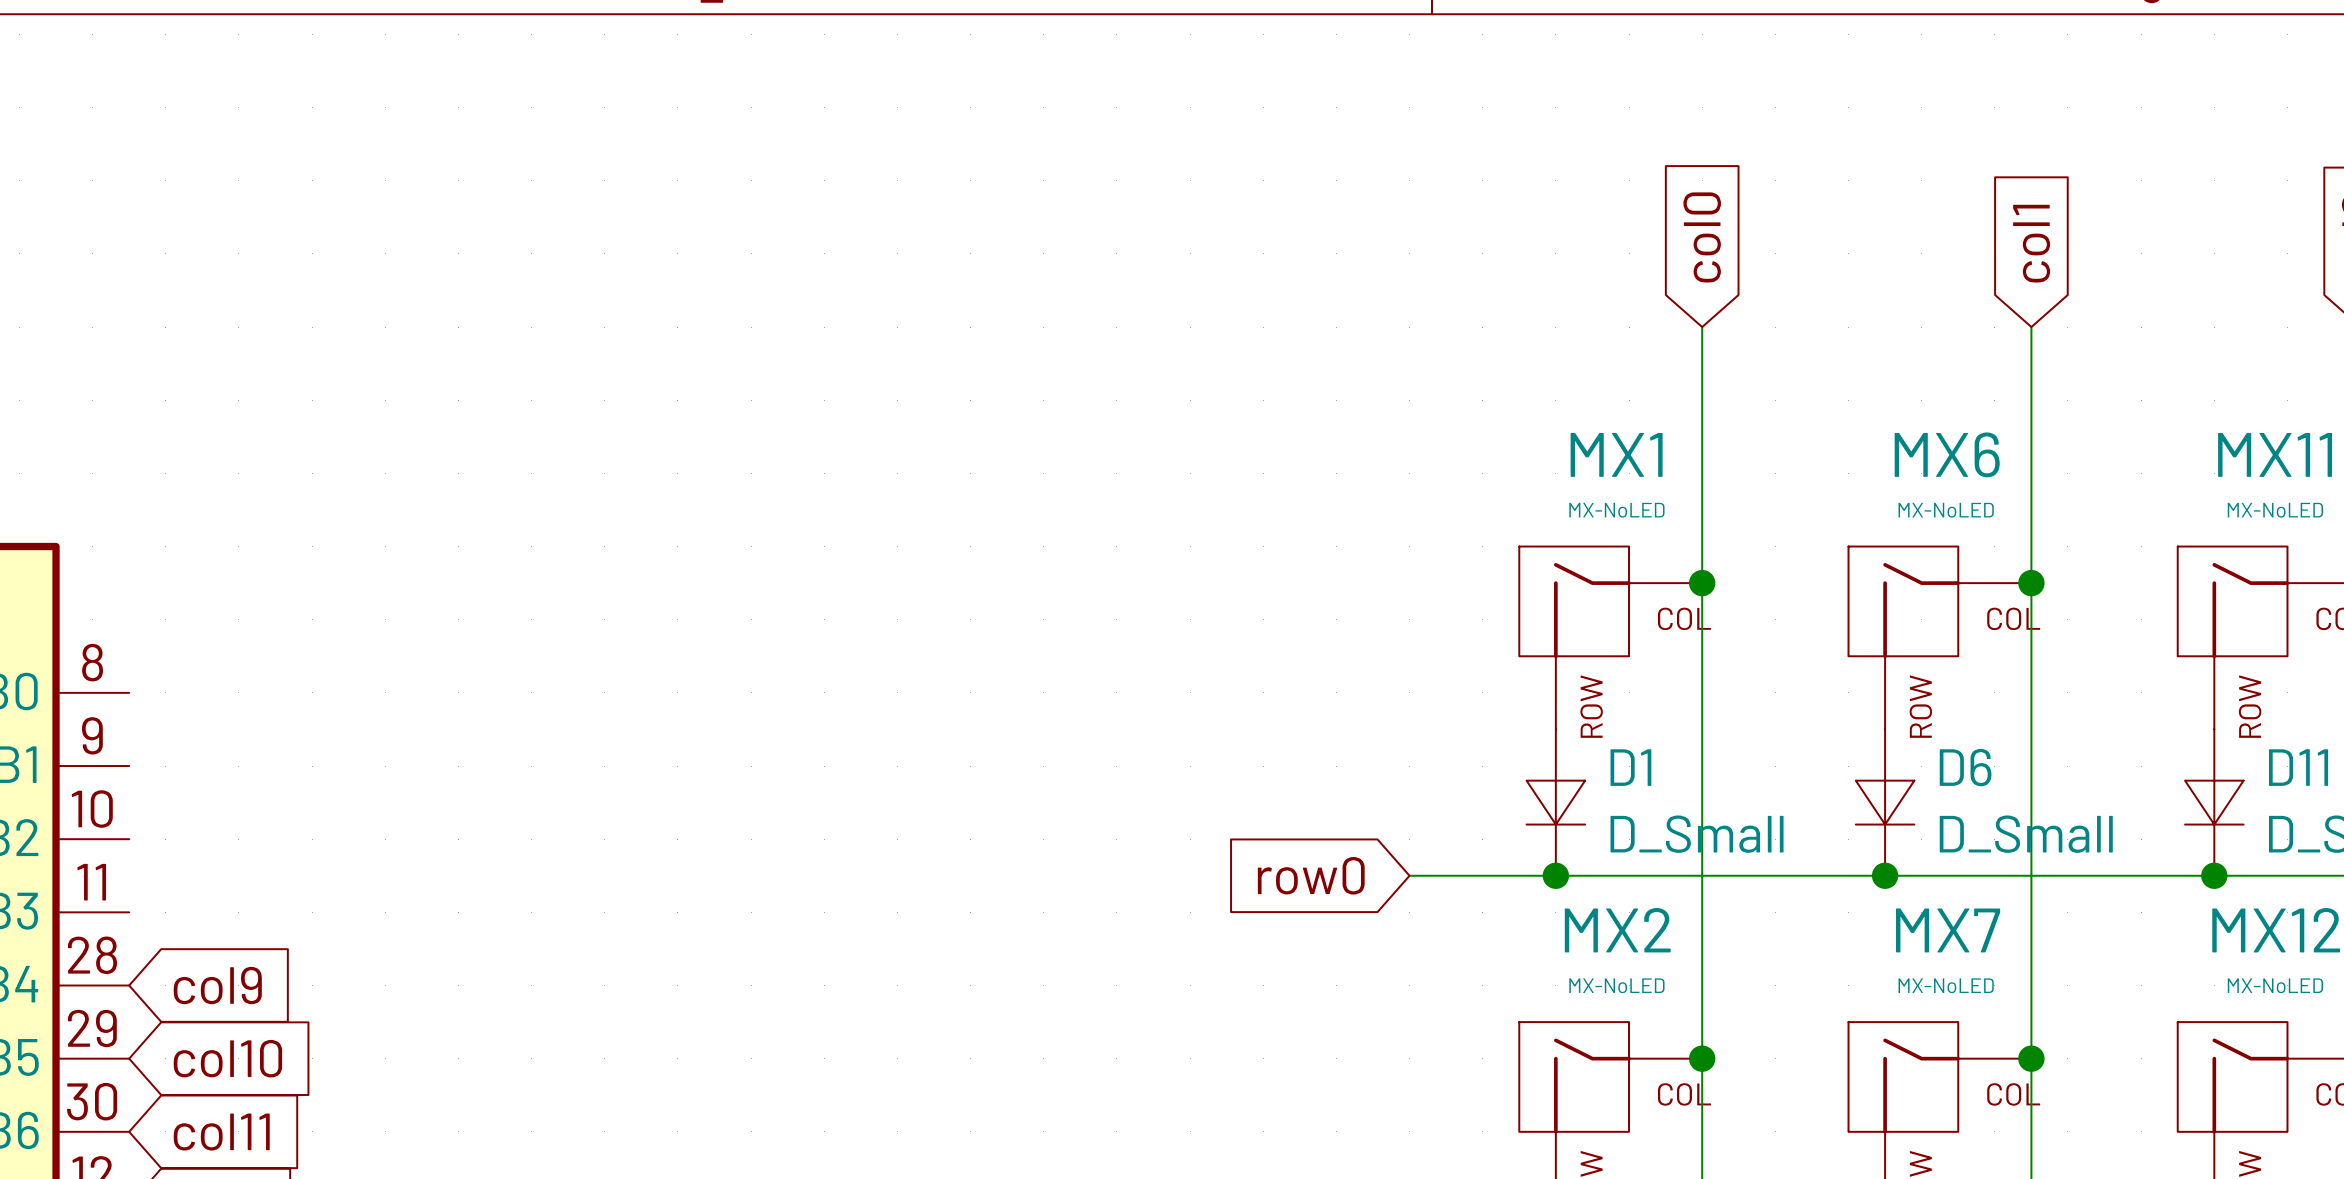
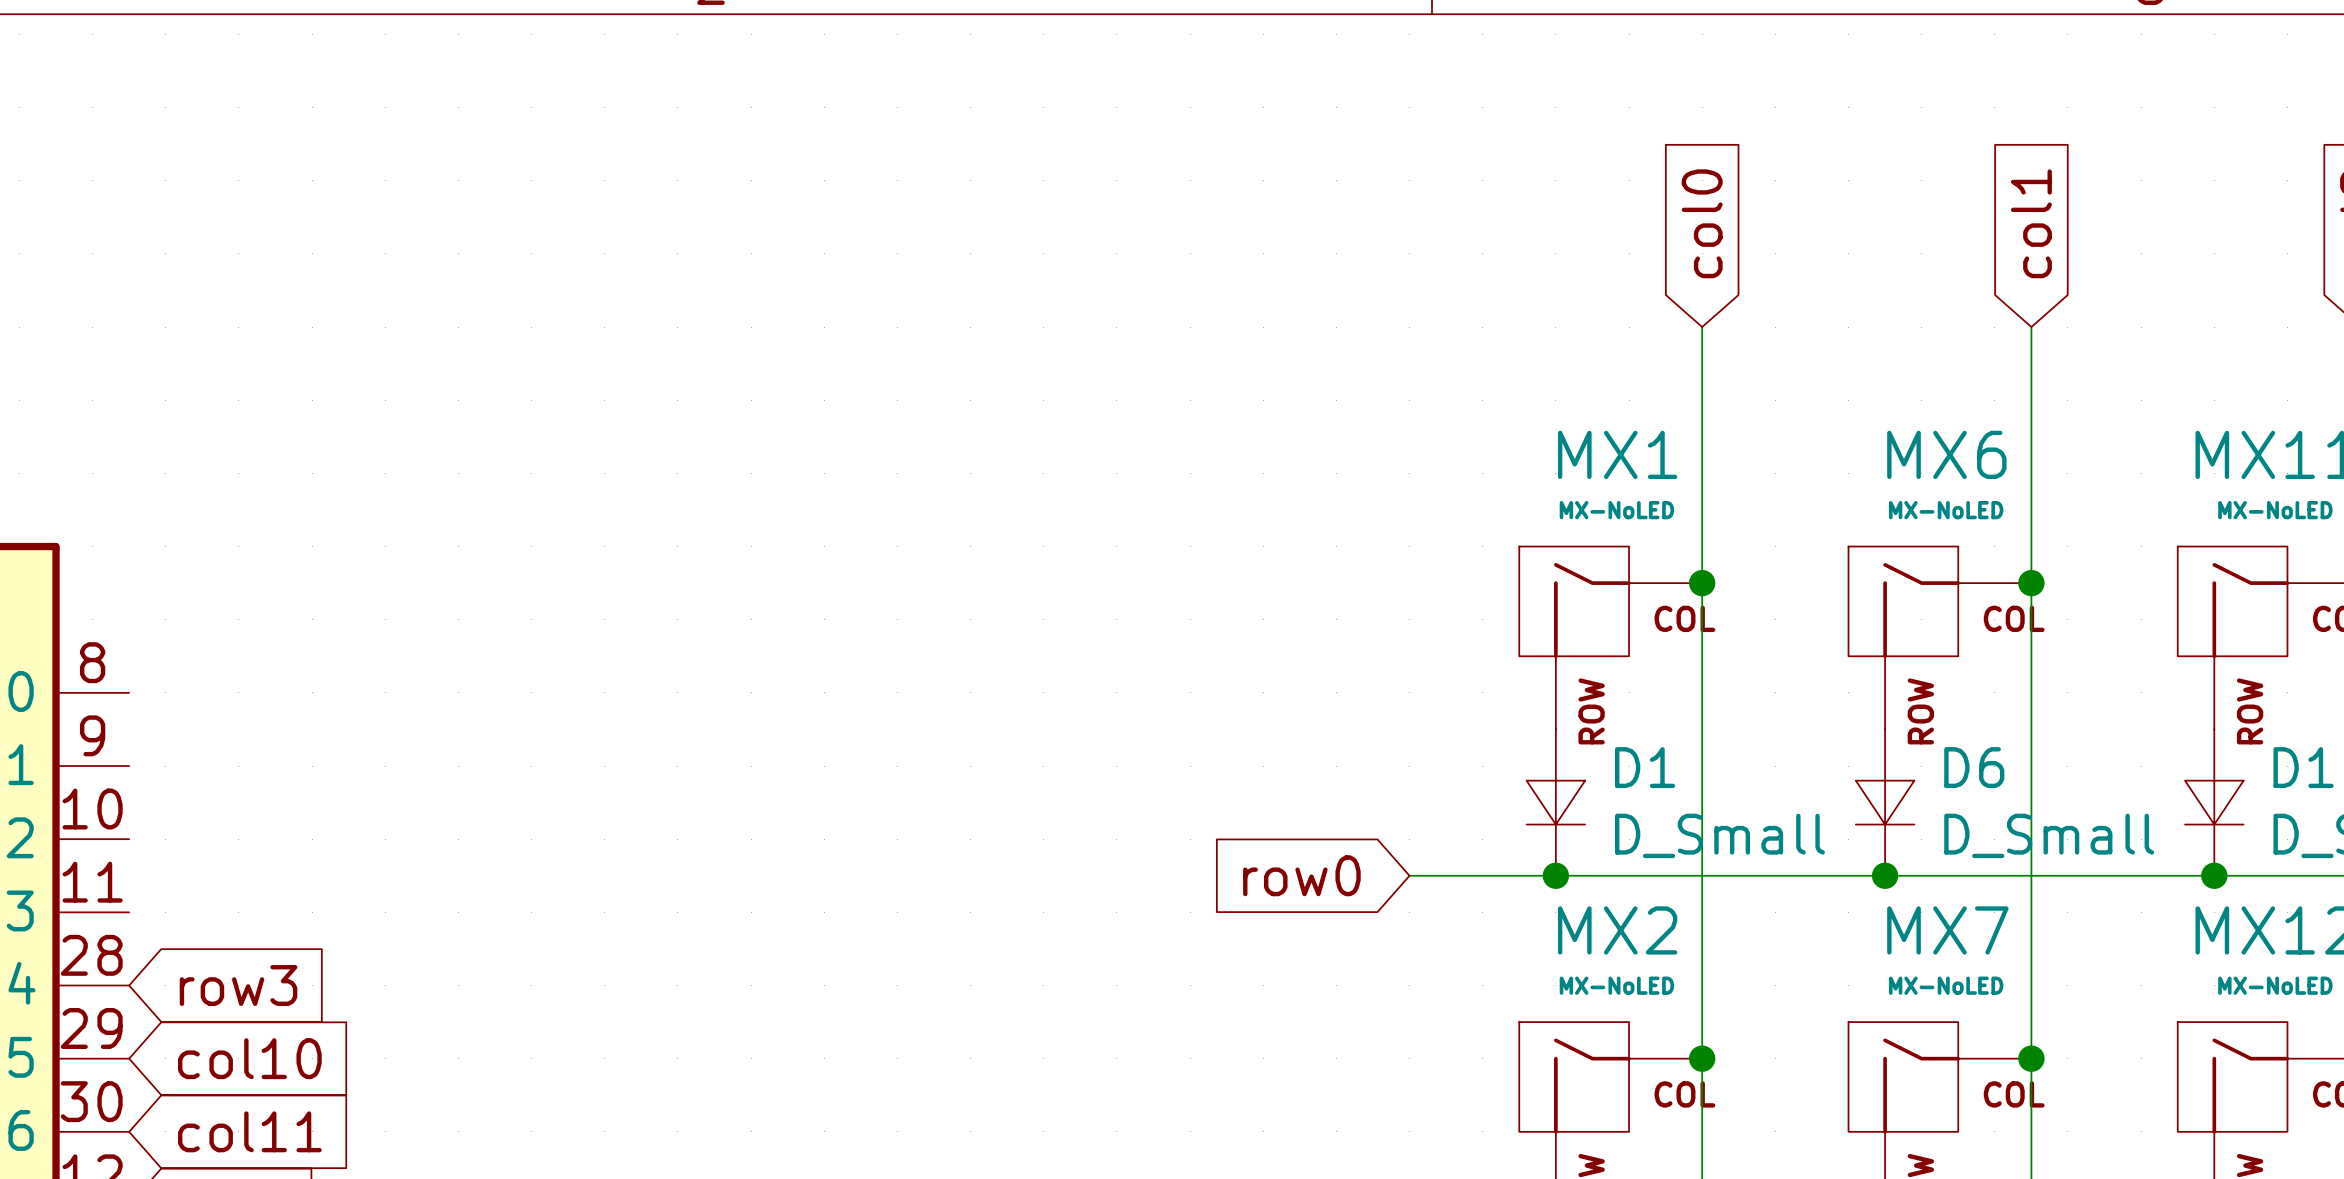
global label: col9 (217, 985) -> row3 (238, 985)

